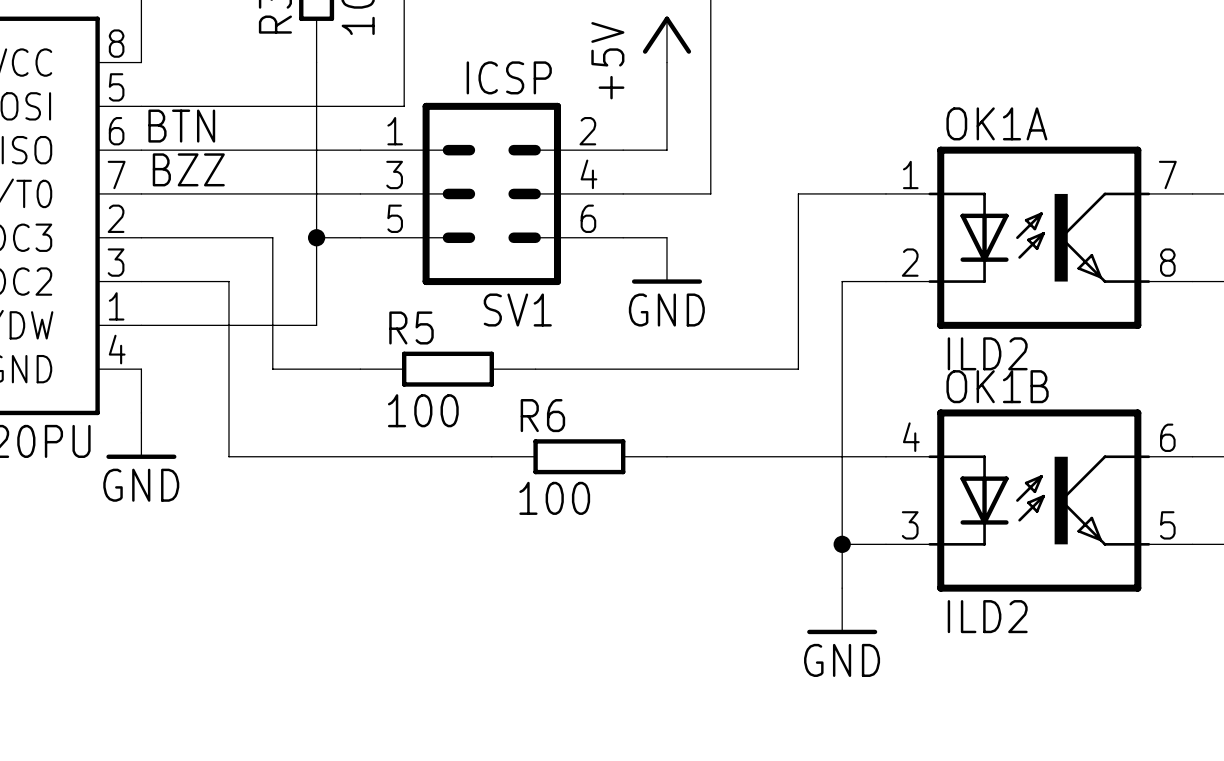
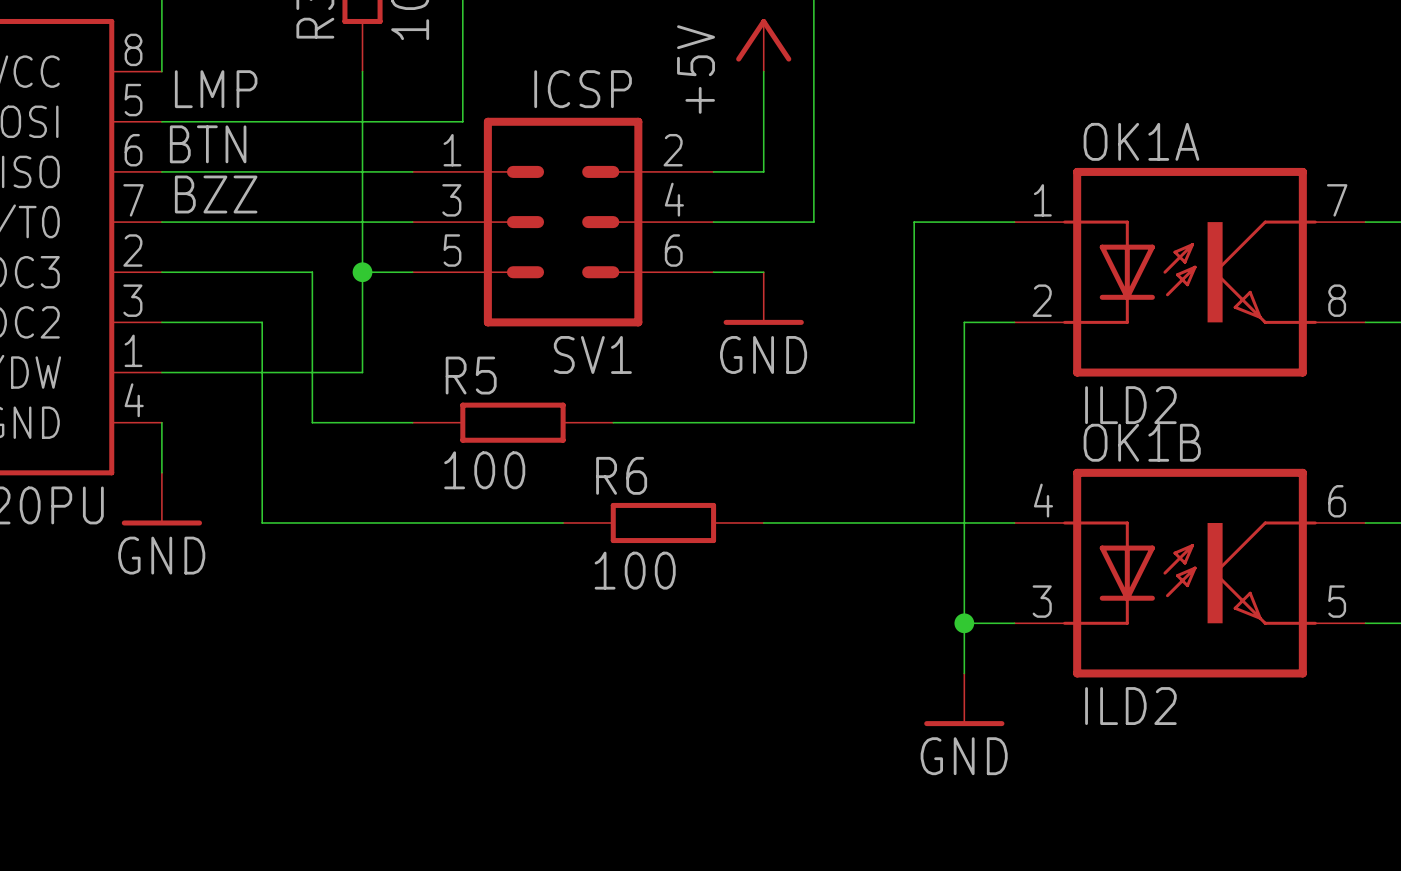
label: none -> LMP (216, 89)

